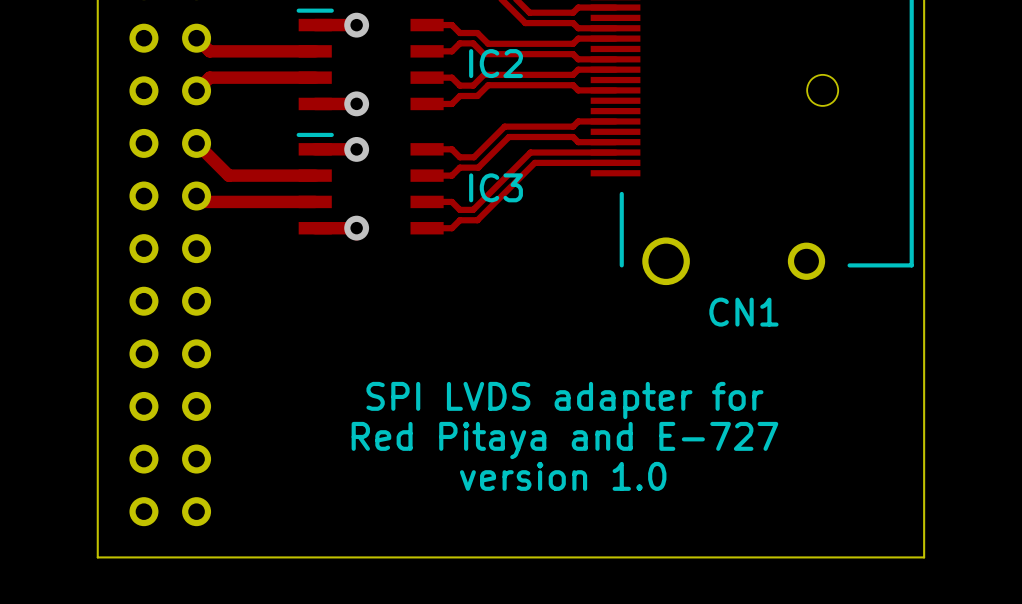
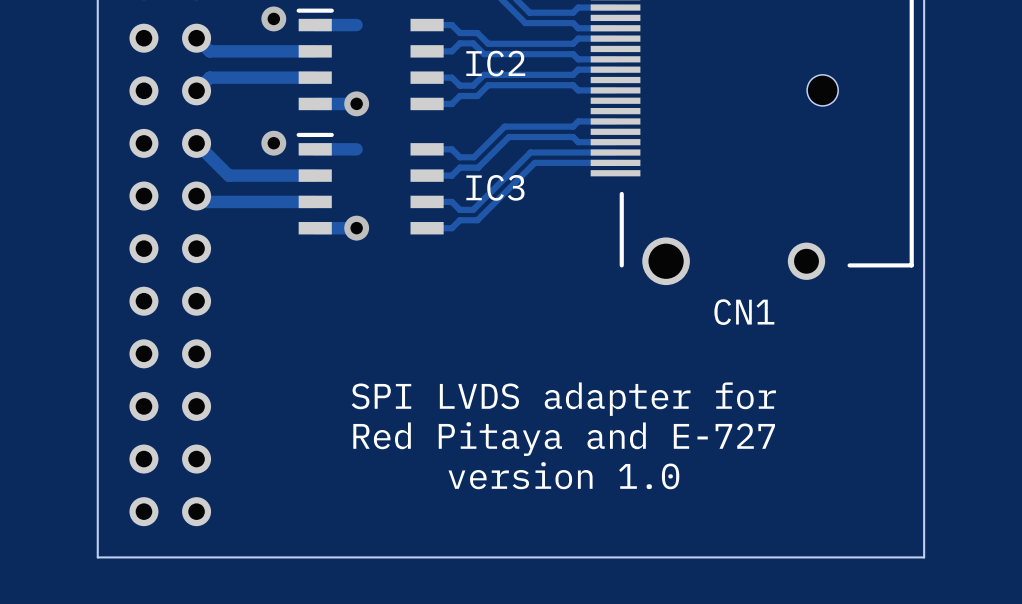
via: none -> (273, 18)
via: (356, 25) -> none
via: none -> (273, 143)
via: (356, 149) -> none

